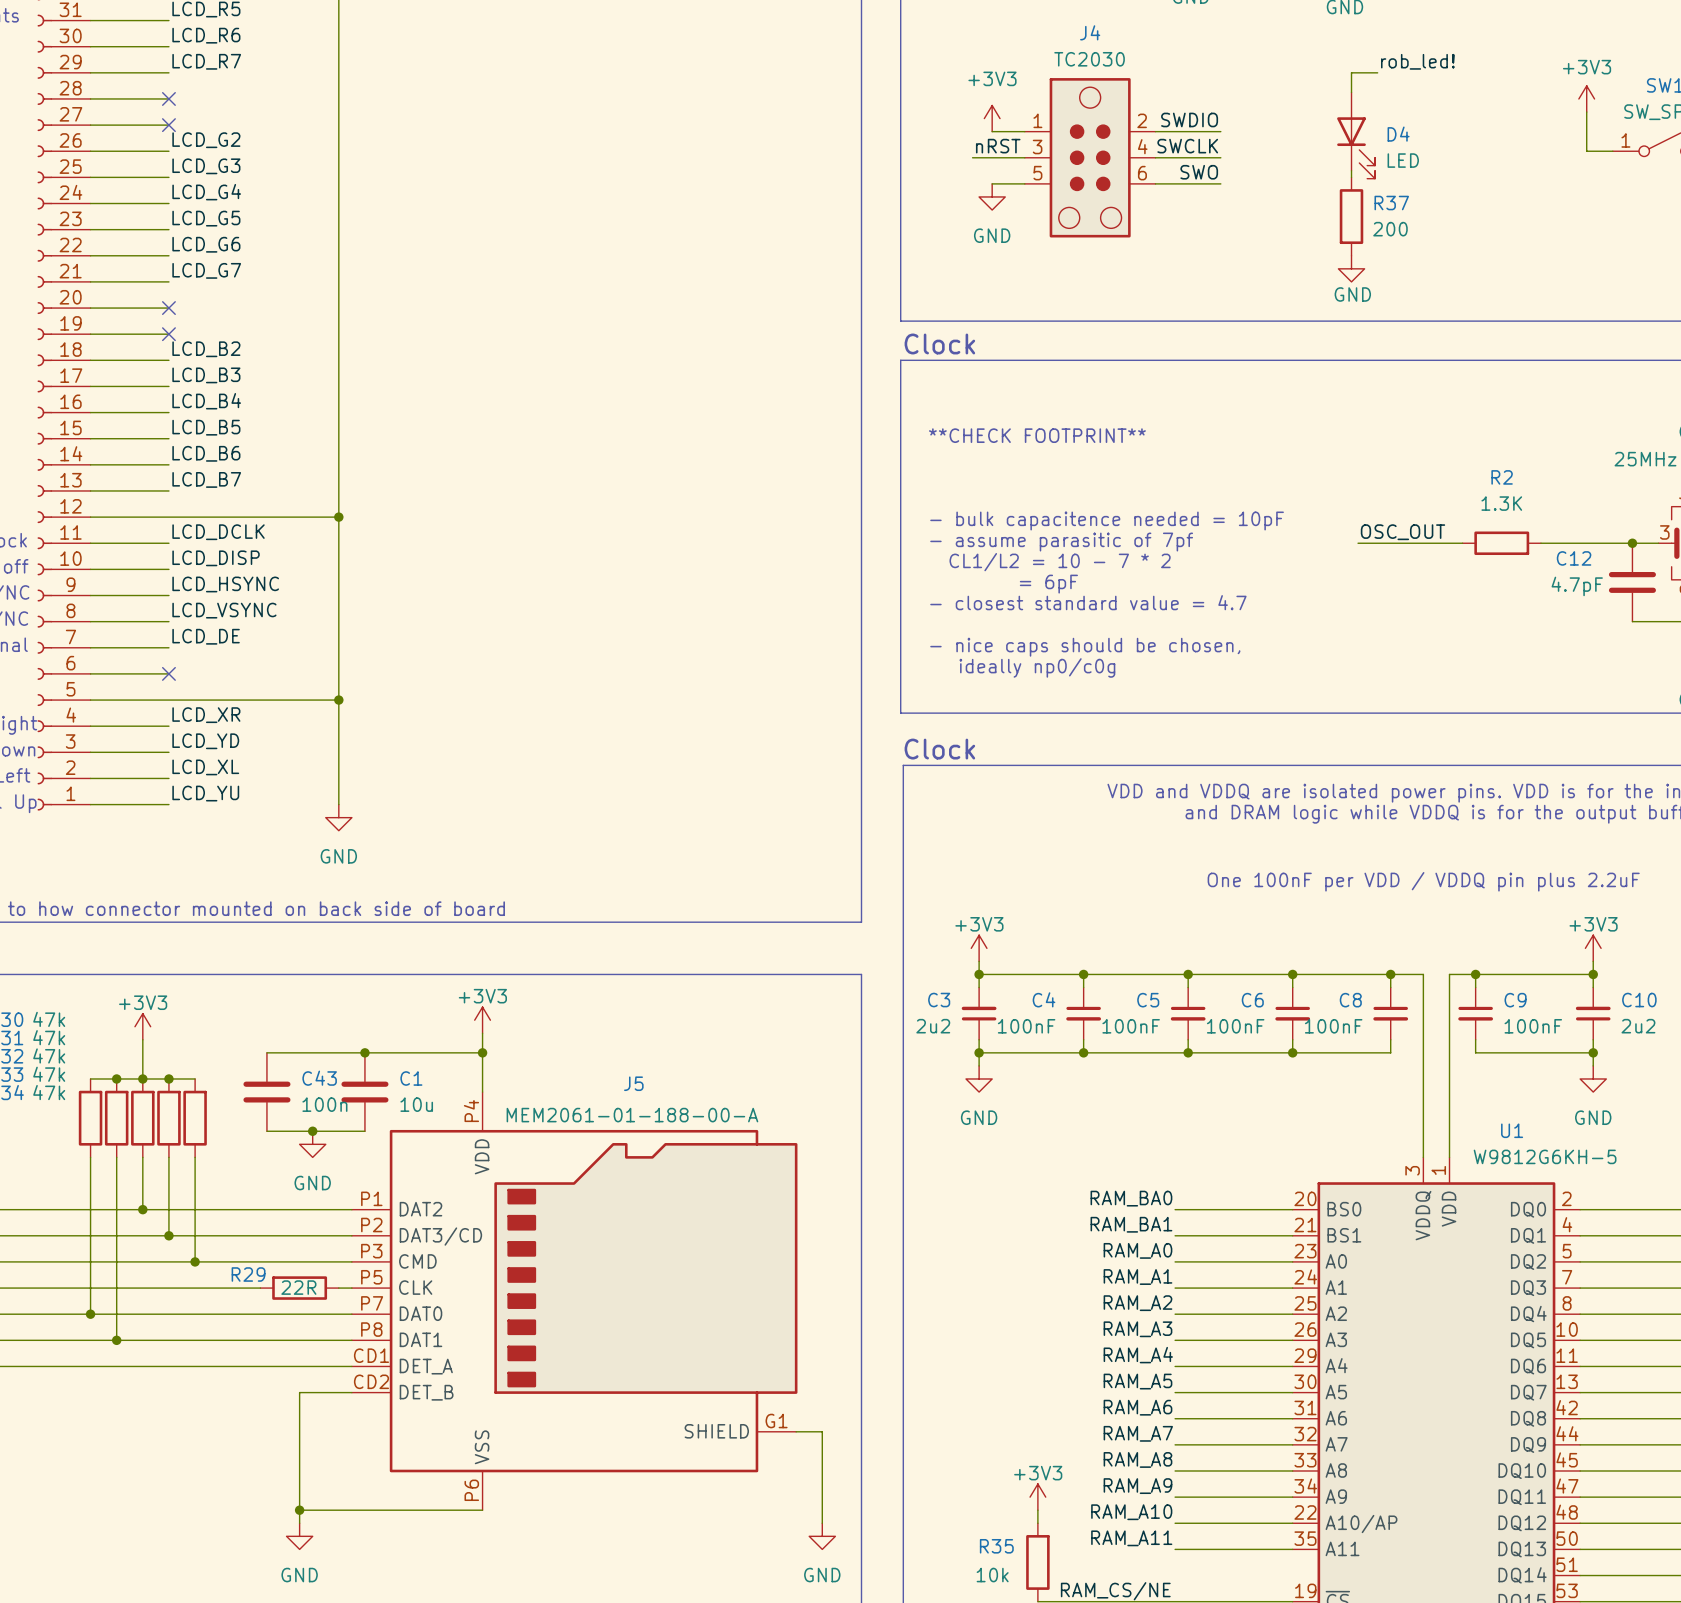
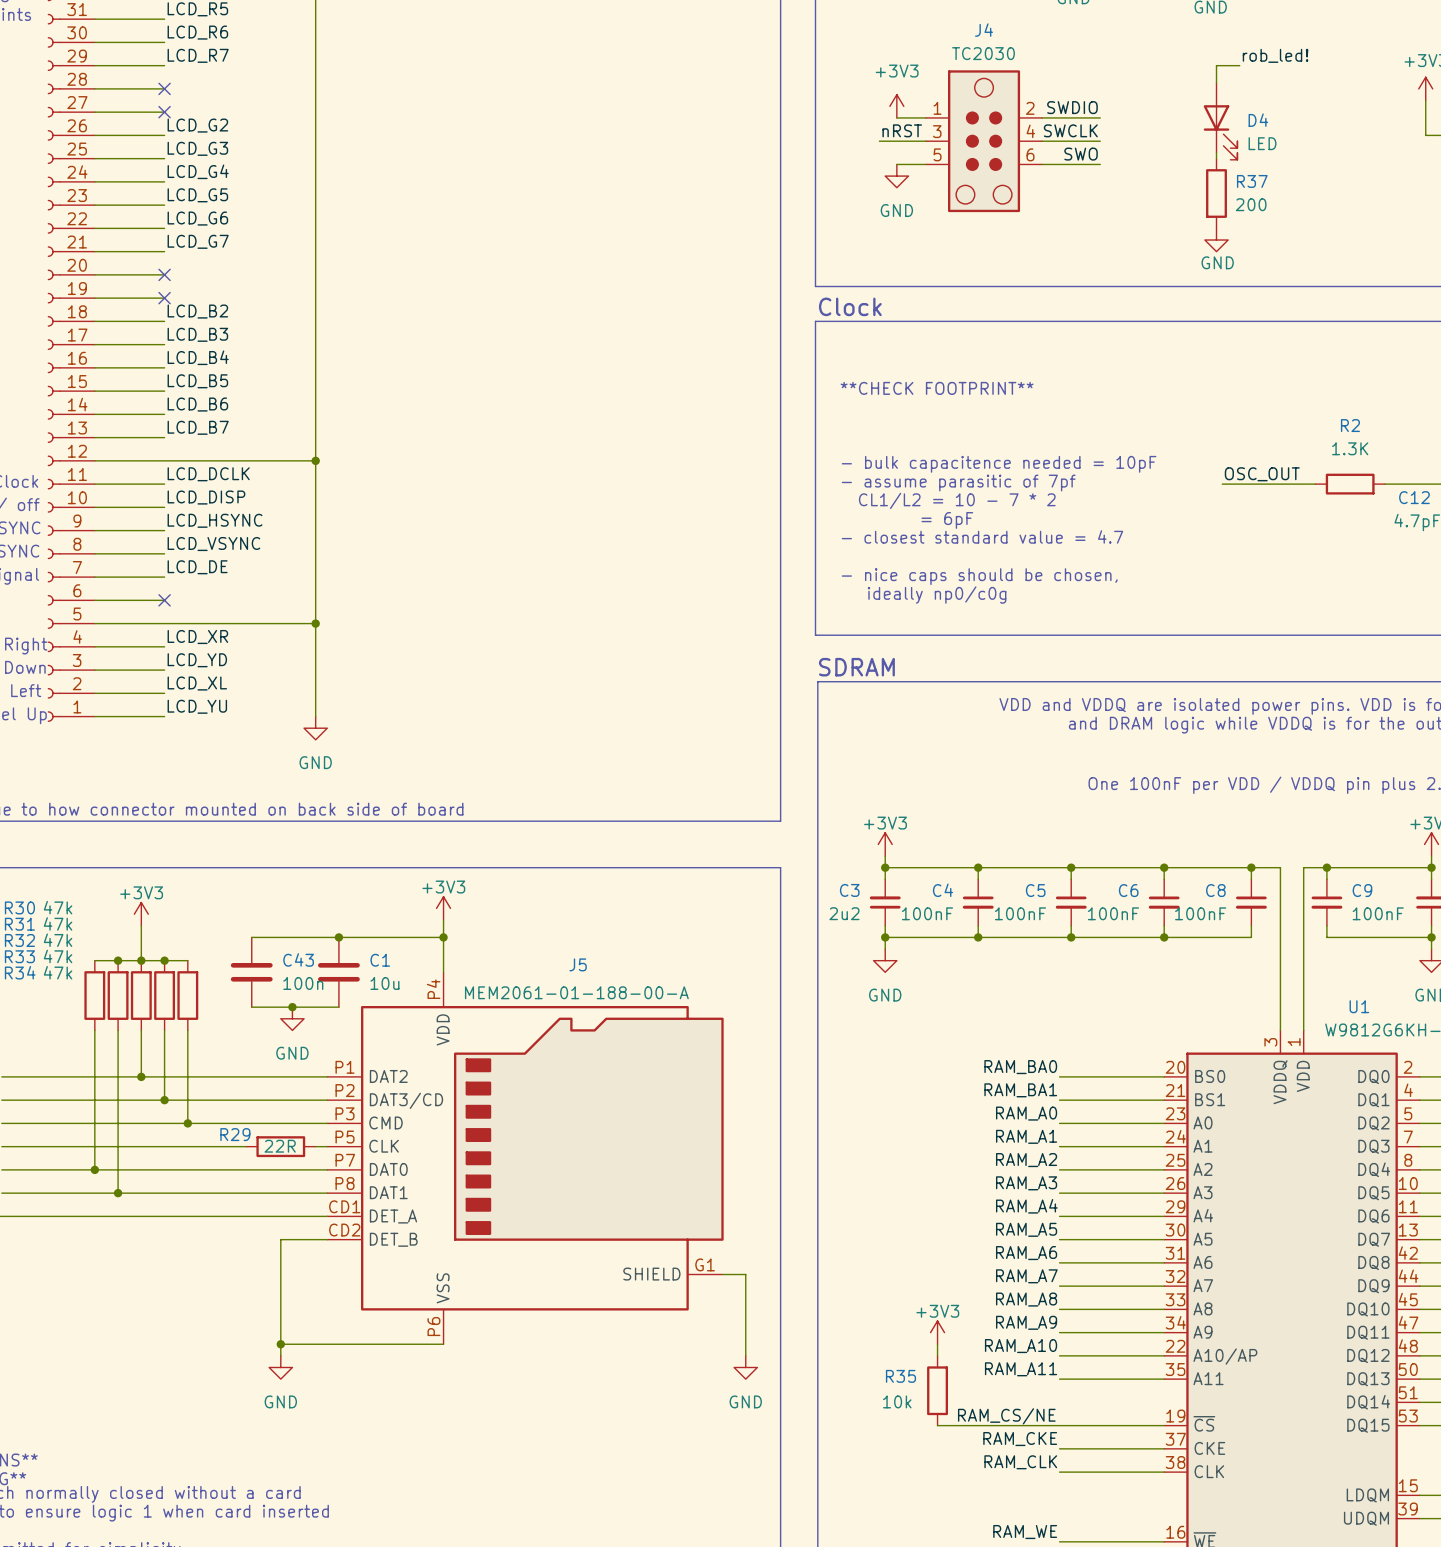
text: Clock (939, 749) -> SDRAM (856, 667)

